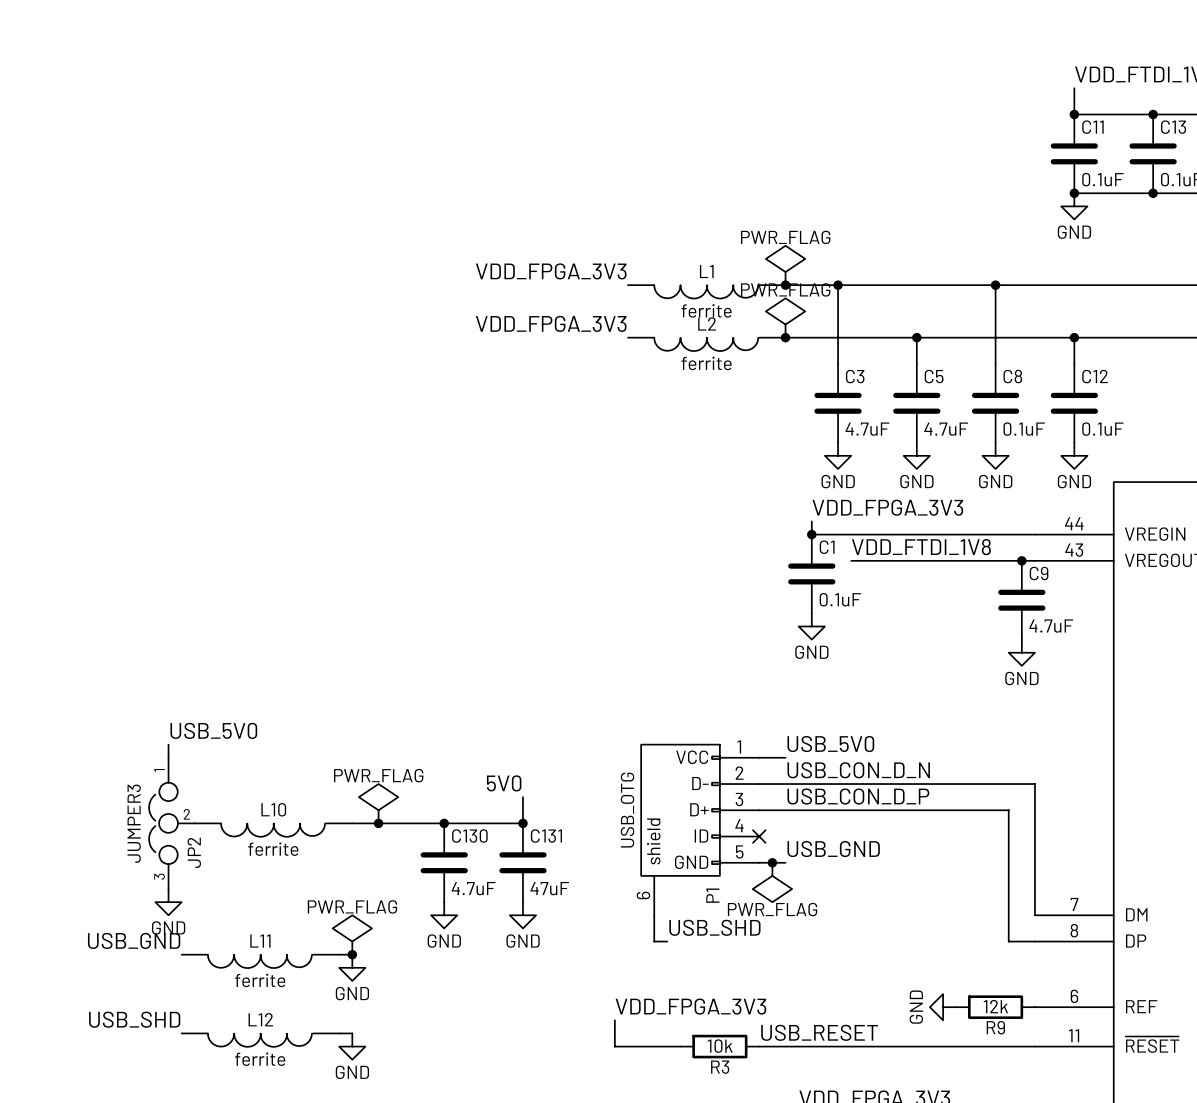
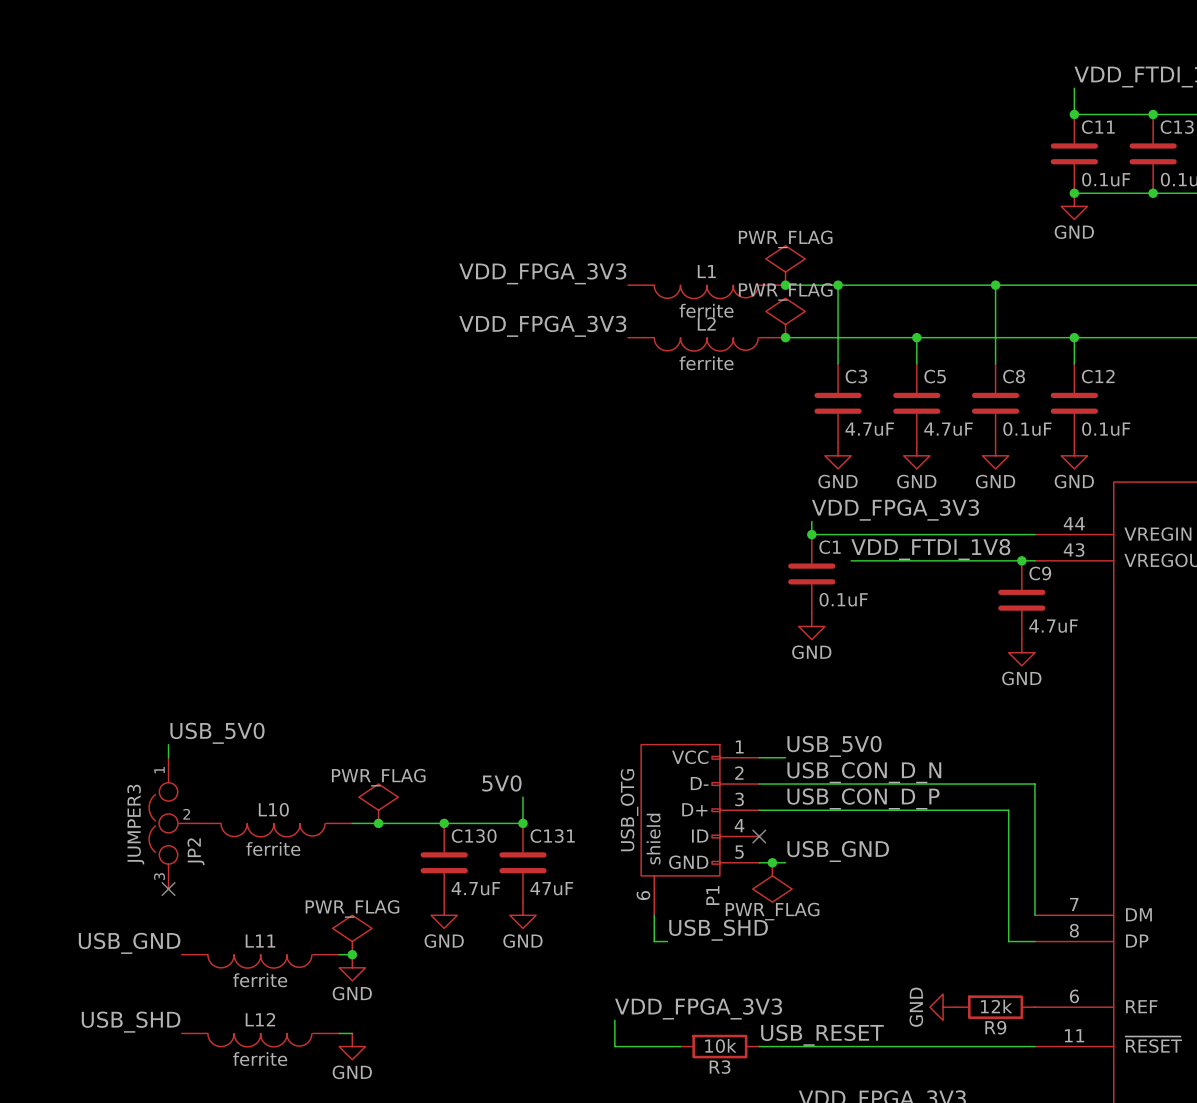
no-connect mark: none -> (168, 889)
power symbol: GND (168, 902) -> none

